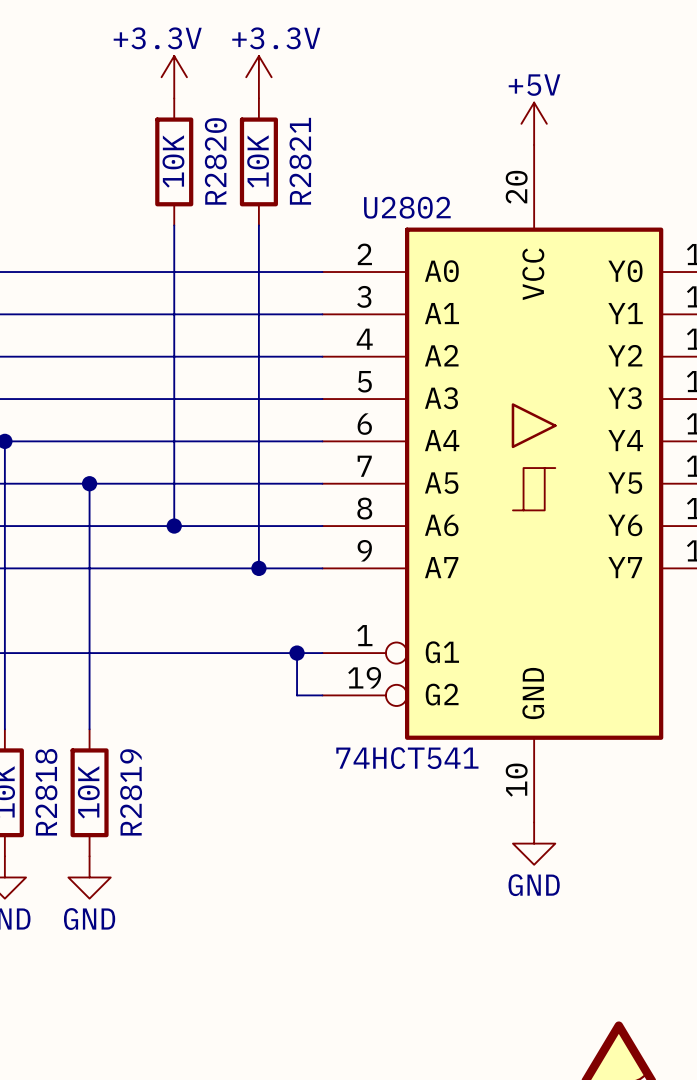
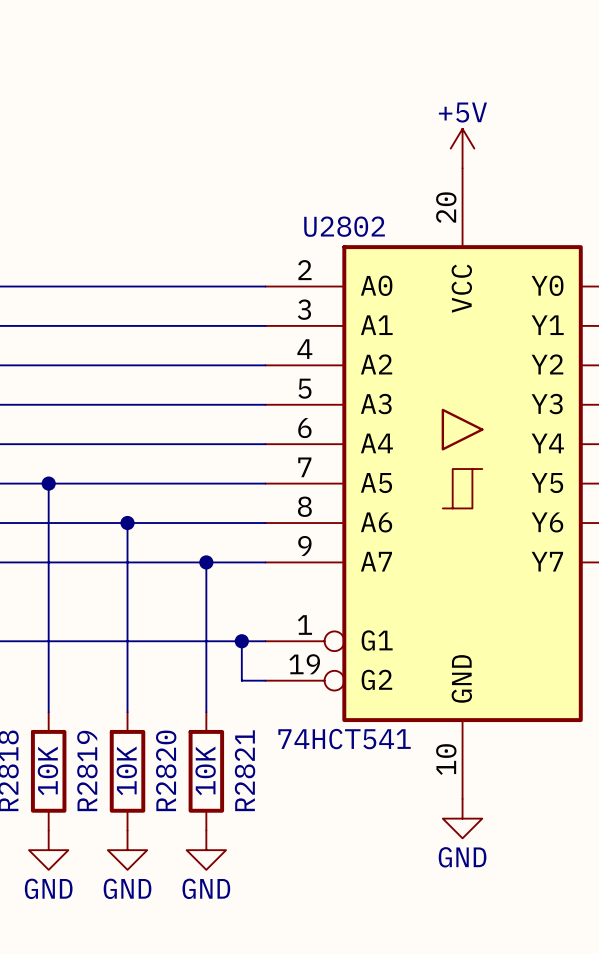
power symbol: +3.3V (174, 77) -> none
power symbol: +3.3V (258, 77) -> none
R2820 position: (174, 161) -> (127, 771)
R2821 position: (258, 161) -> (206, 771)
wire: (174, 225) (174, 526) -> (127, 712) (127, 523)
wire: (258, 225) (258, 568) -> (206, 712) (206, 562)
power symbol: none -> GND (127, 850)
power symbol: none -> GND (206, 850)

